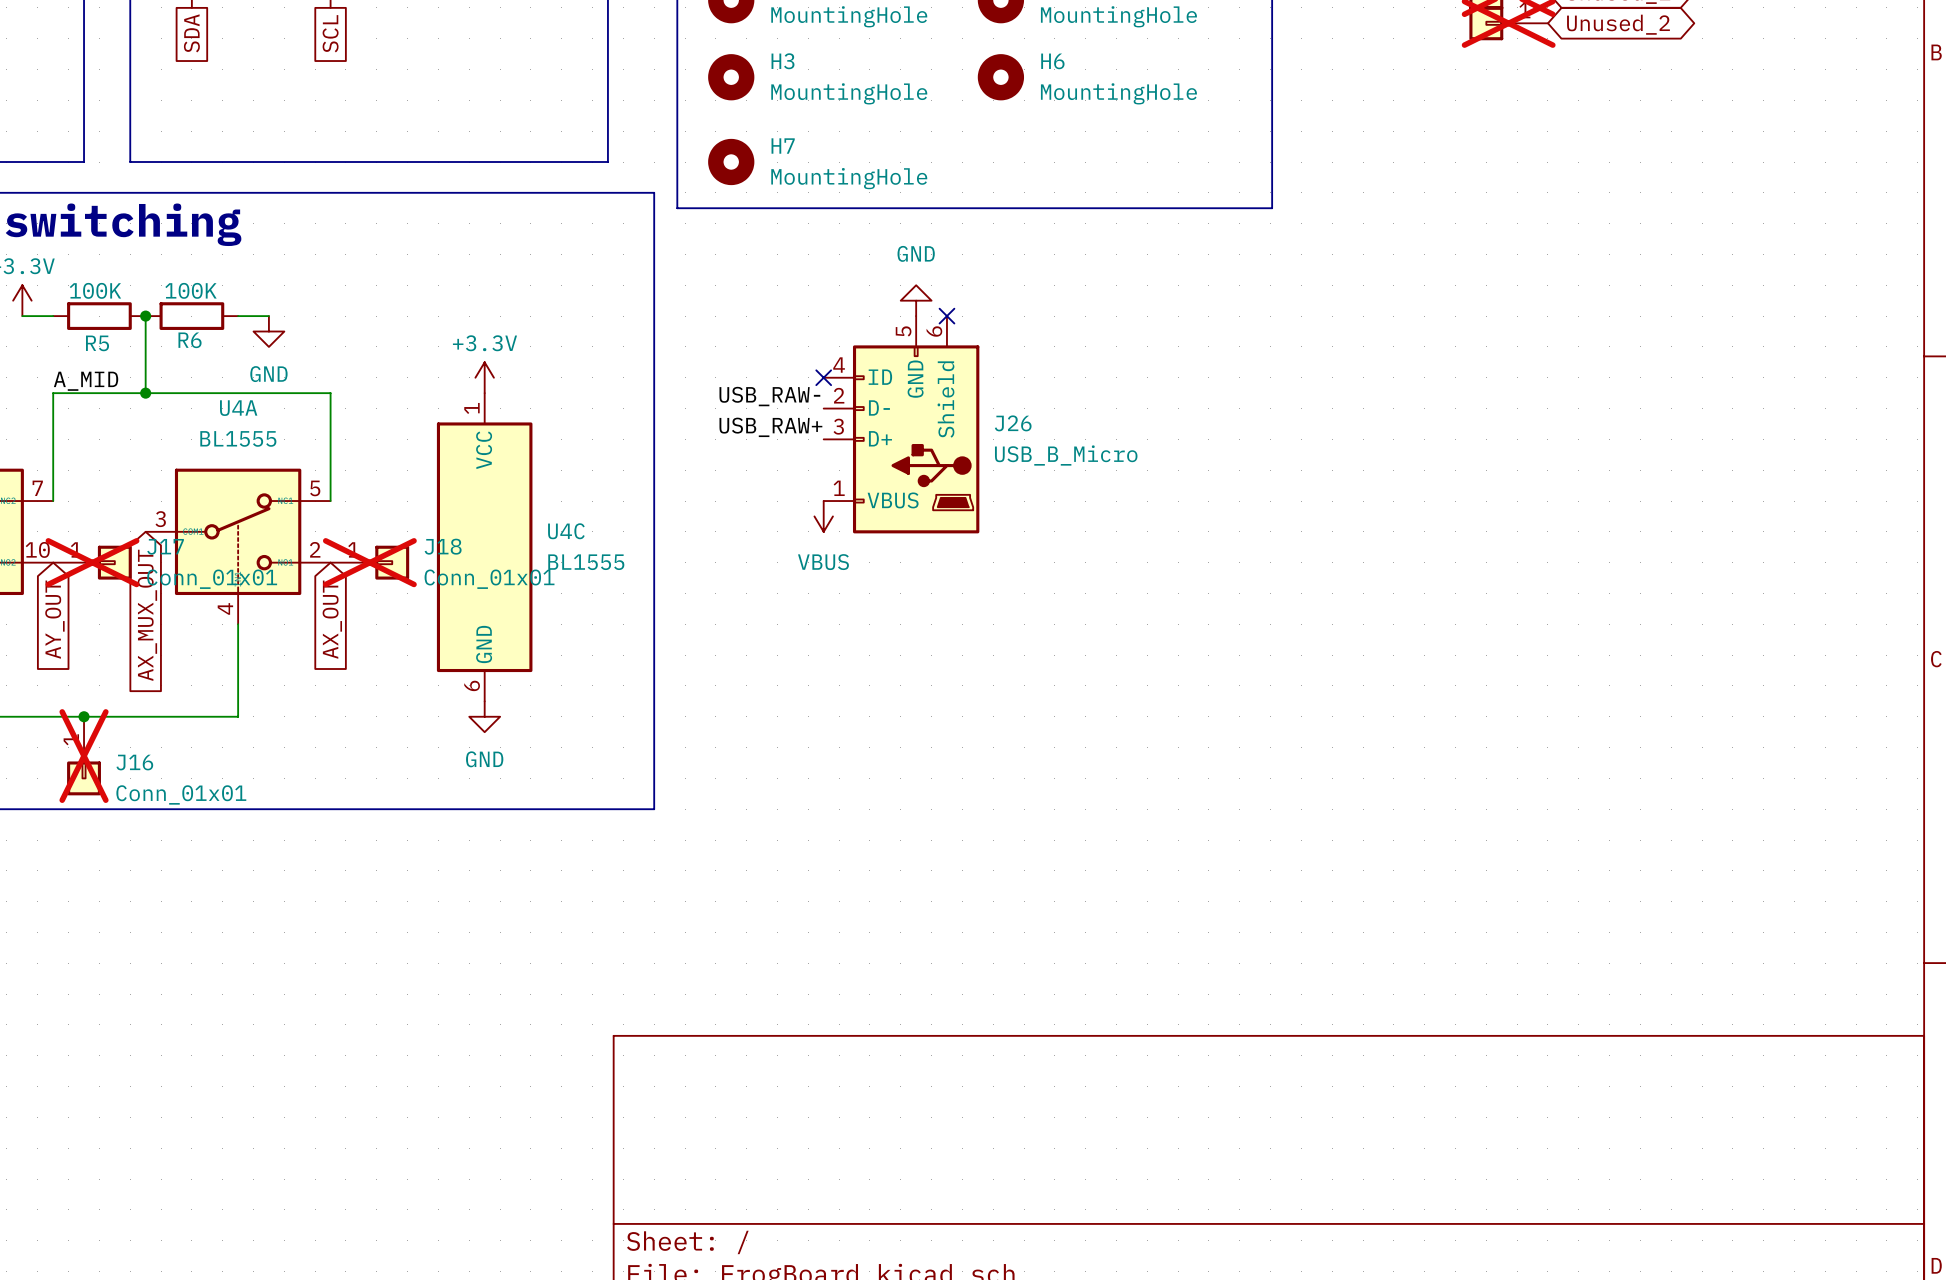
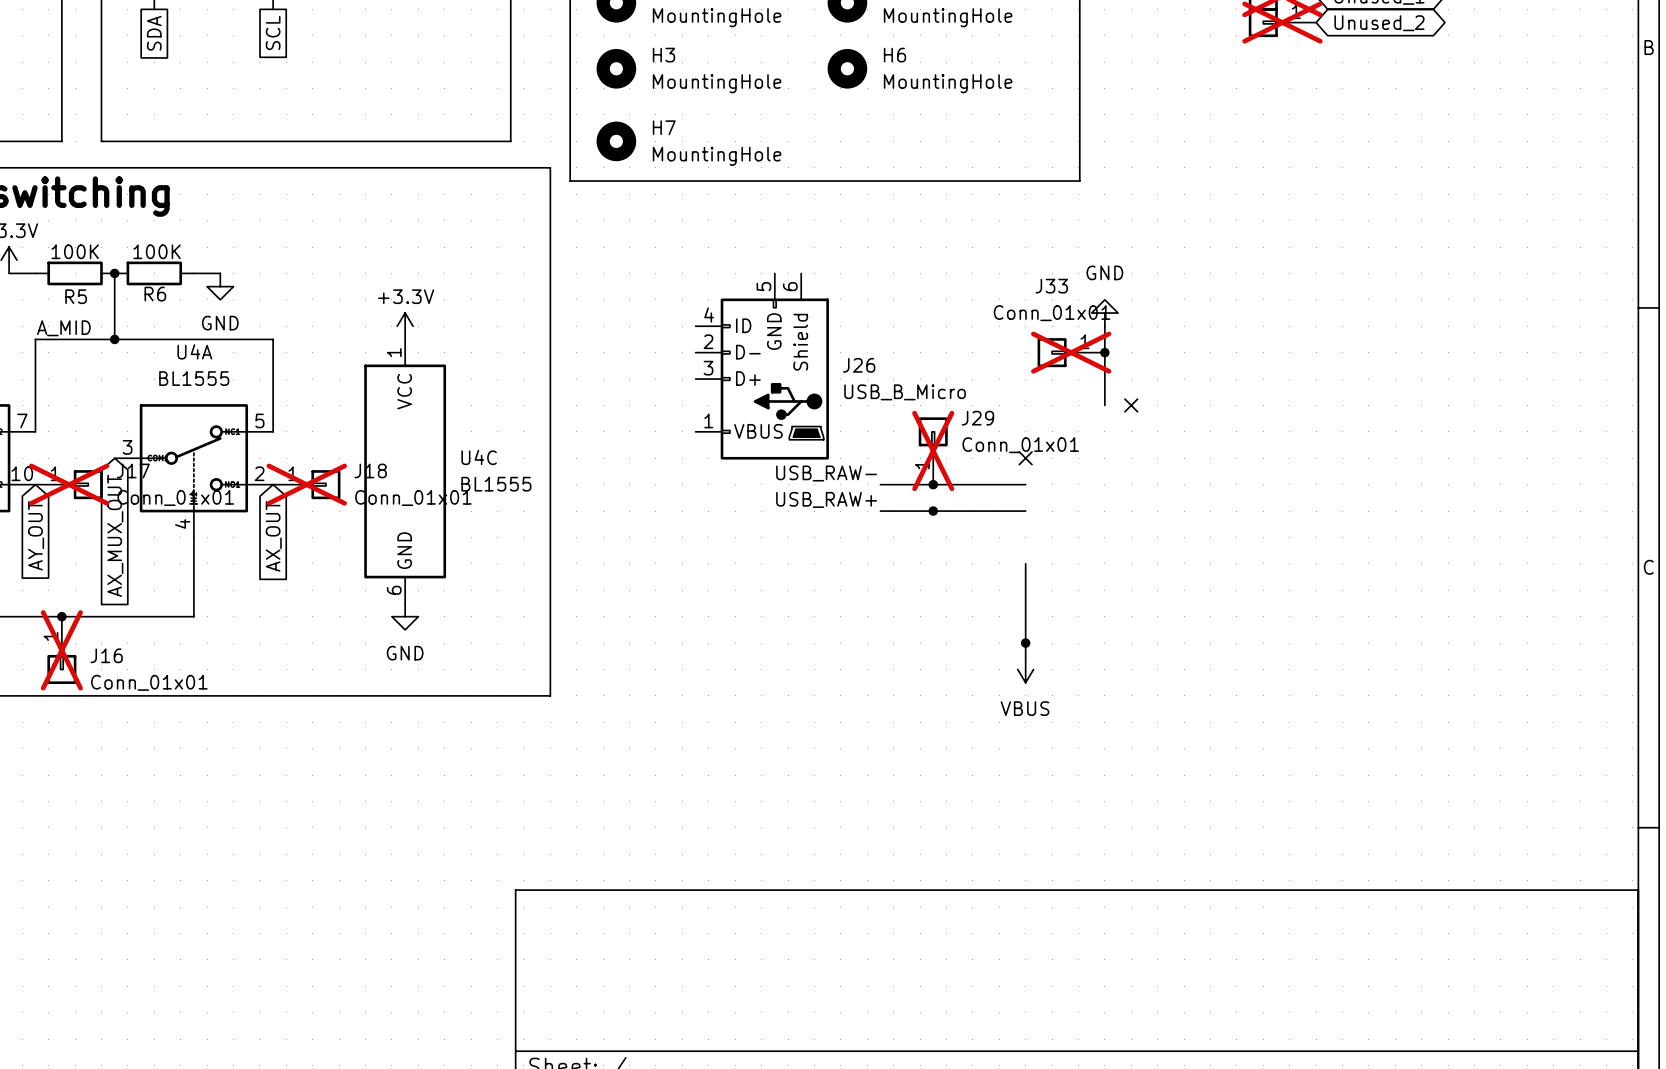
power symbol: GND (916, 300) -> none
no-connect mark: (946, 316) -> none
power symbol: none -> GND (1104, 313)
no-connect mark: (823, 377) -> none
wire: none -> (1104, 326) (1104, 405)
label position: USB_RAW- (769, 396) -> USB_RAW- (826, 473)
J33: none -> Conn_01x01 (1071, 352)
junction: none -> (1104, 352)
label position: USB_RAW+ (770, 427) -> USB_RAW+ (826, 499)
no-connect mark: none -> (1131, 405)
power symbol: VBUS (823, 516) -> none
J29: none -> Conn_01x01 (933, 450)
no-connect mark: none -> (1025, 458)
wire: none -> (880, 484) (1025, 484)
junction: none -> (933, 484)
wire: none -> (880, 511) (1025, 511)
junction: none -> (933, 511)
wire: none -> (1025, 563) (1025, 656)
junction: none -> (1025, 643)
power symbol: none -> VBUS (1025, 669)

